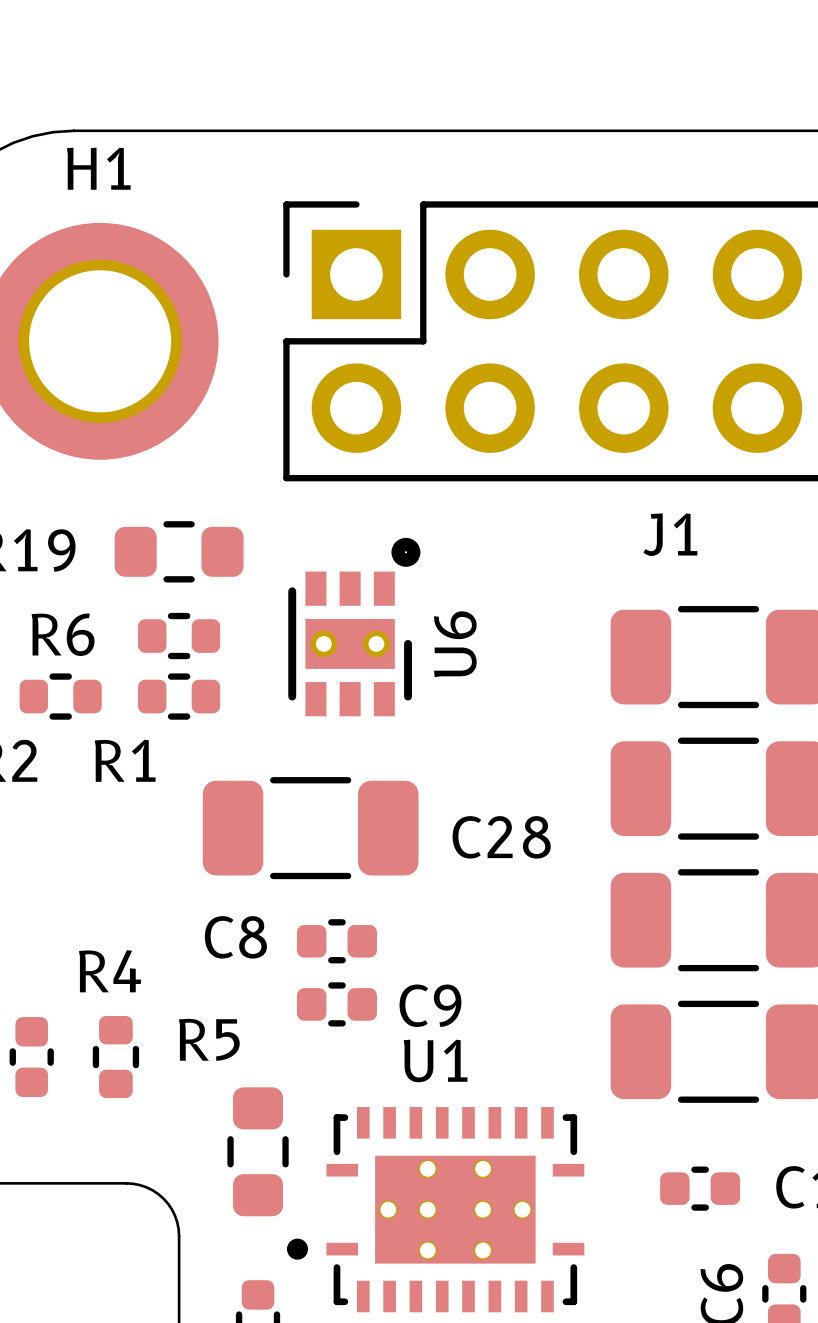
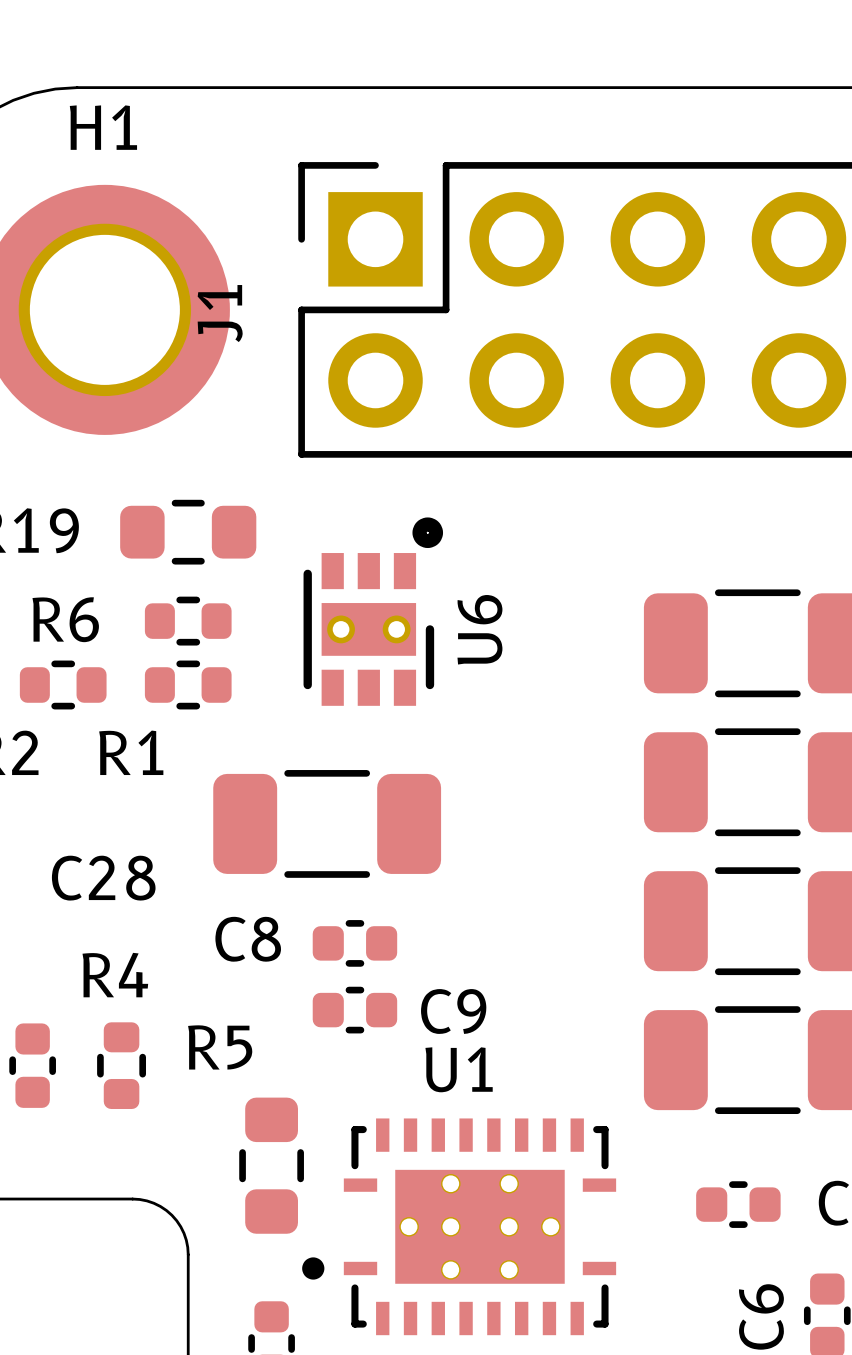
J1 name rotation: 0° (670, 534) -> 90° counterclockwise (220, 313)
J1 name position: J1 (670, 534) -> J1 (220, 313)
C28 name position: C28 (501, 837) -> C28 (103, 878)

